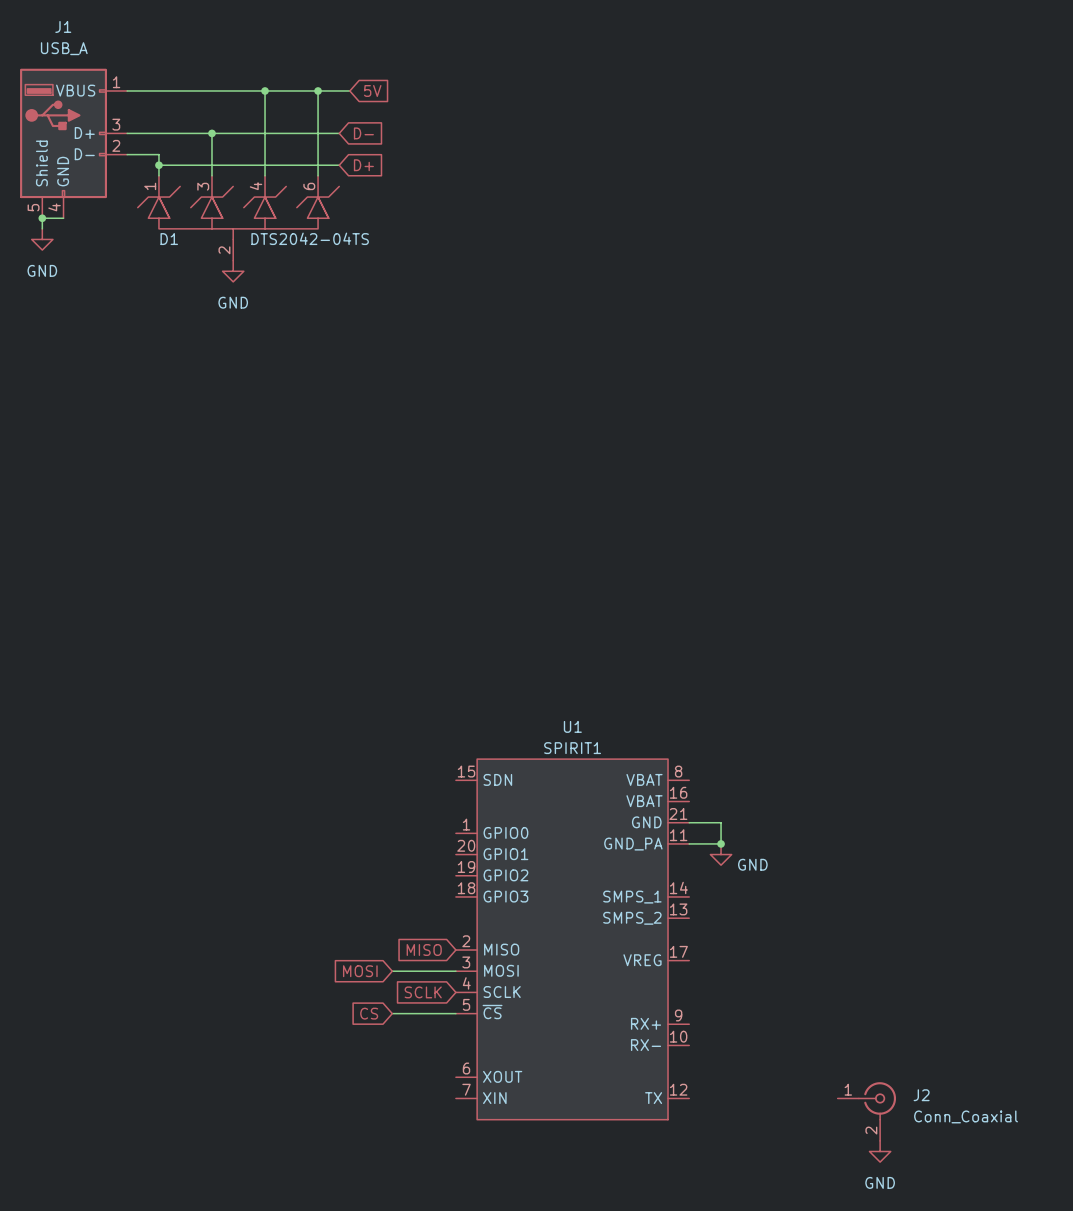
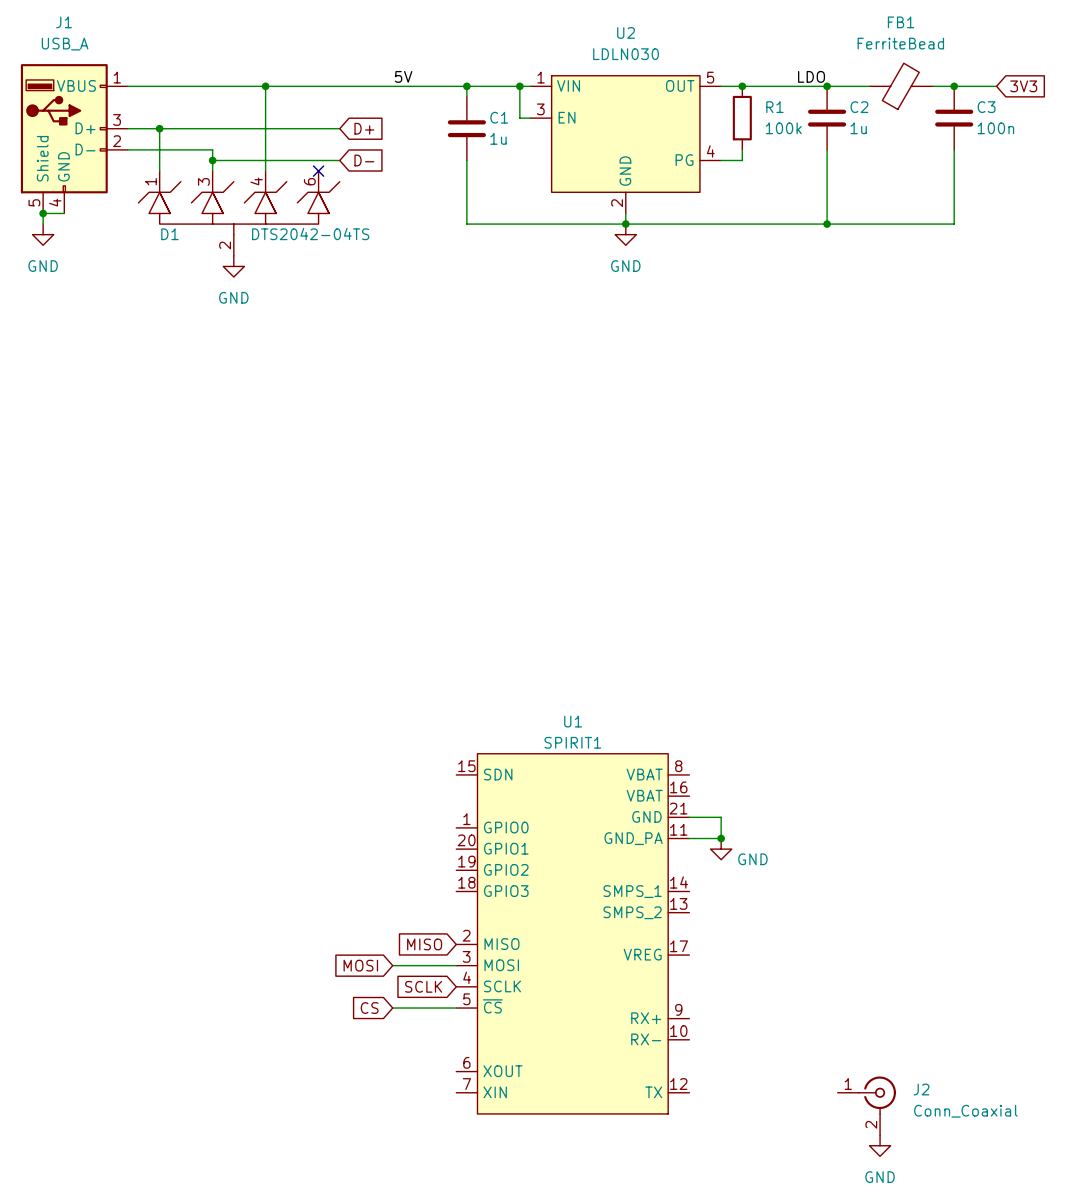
label: none -> 5V (403, 76)
label: none -> LDO (811, 76)
wire: (318, 90) (318, 175) -> none
junction: (318, 90) -> none
wire: none -> (350, 86) (530, 86)
global label: 5V (372, 90) -> none
wire: none -> (466, 86) (466, 96)
junction: none -> (466, 86)
wire: none -> (519, 86) (519, 118) (530, 118)
junction: none -> (519, 86)
wire: none -> (721, 86) (869, 86)
junction: none -> (742, 86)
junction: none -> (827, 86)
FB1: none -> FerriteBead (901, 86)
wire: none -> (933, 86) (996, 86)
junction: none -> (954, 86)
global label: none -> 3V3 (1023, 86)
R1: none -> 100k (742, 118)
C2: none -> 1u (827, 118)
C3: none -> 100n (954, 118)
junction: none -> (159, 128)
wire: (211, 133) (211, 154) -> (159, 128) (159, 149) (212, 149)
junction: (211, 133) -> none
global label: D- (363, 133) -> D+ (364, 128)
C1: none -> 1u (466, 128)
U2: none -> LDLN030 (625, 144)
wire: none -> (742, 149) (742, 160) (721, 160)
wire: none -> (827, 149) (827, 224)
wire: none -> (954, 149) (954, 224) (466, 224) (466, 160)
wire: (158, 165) (211, 165) -> none
junction: (158, 165) -> none
junction: none -> (212, 160)
global label: D+ (363, 165) -> D- (364, 160)
no-connect mark: none -> (318, 171)
wire: none -> (625, 213) (625, 224)
junction: none -> (625, 224)
junction: none -> (827, 224)
power symbol: none -> GND (625, 234)

